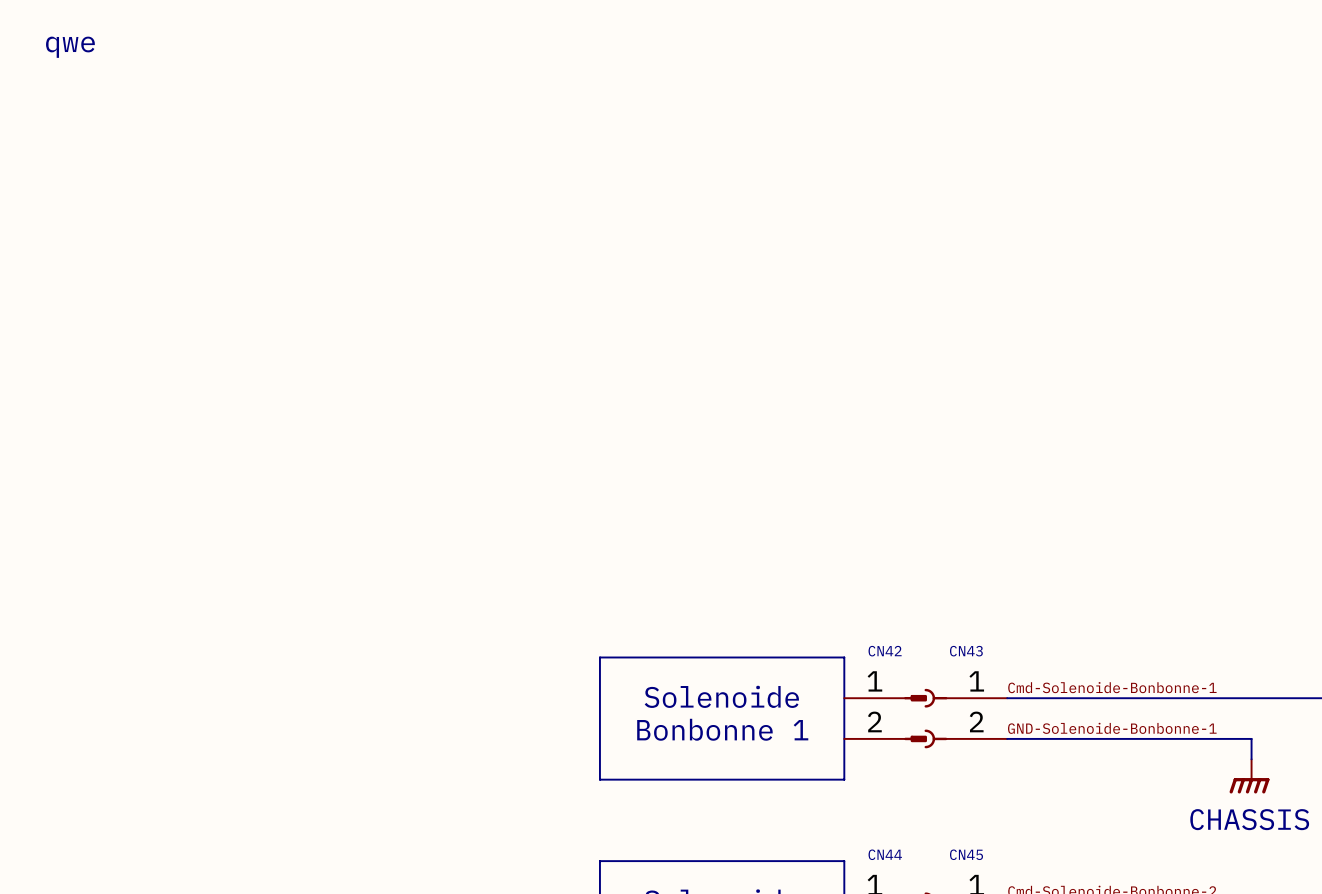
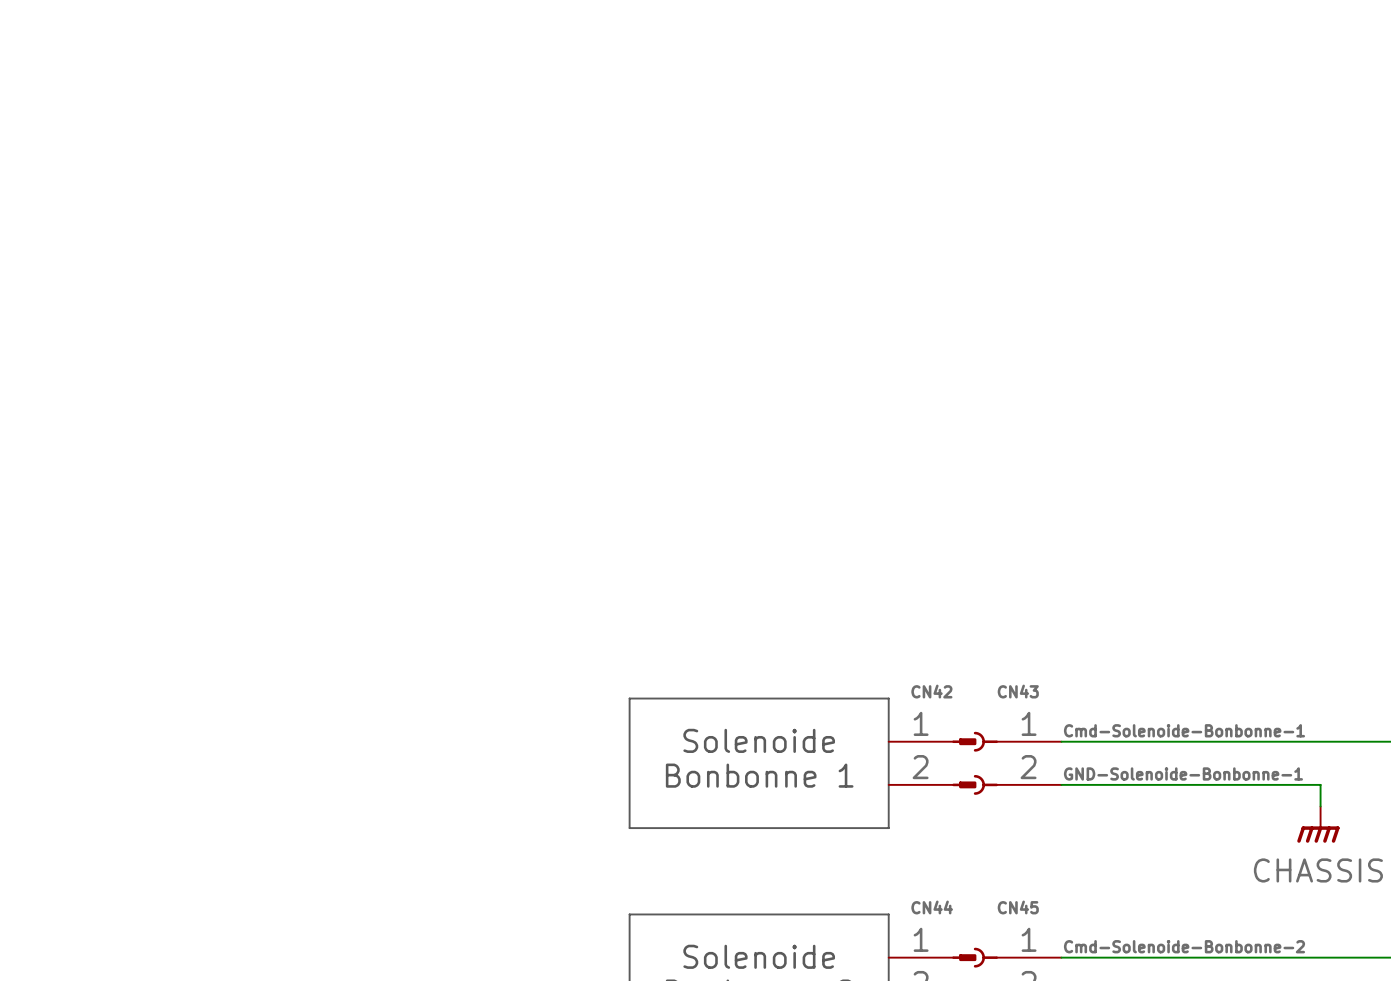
text: qwe (70, 47) -> none

